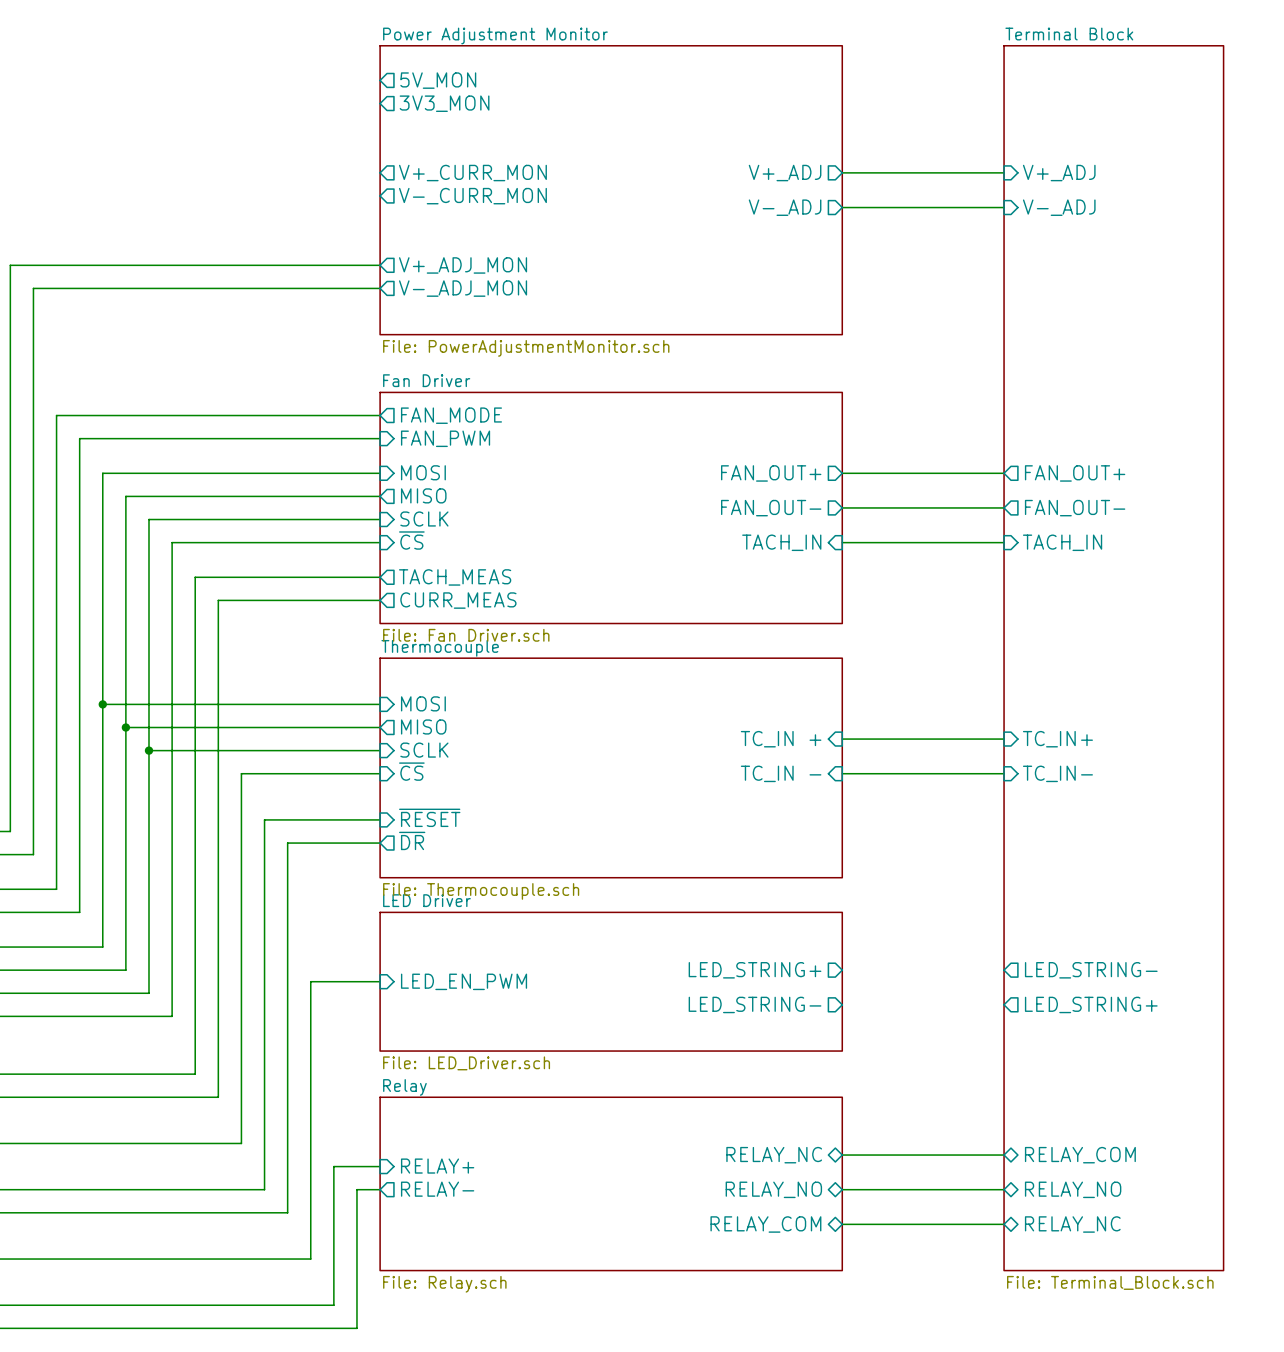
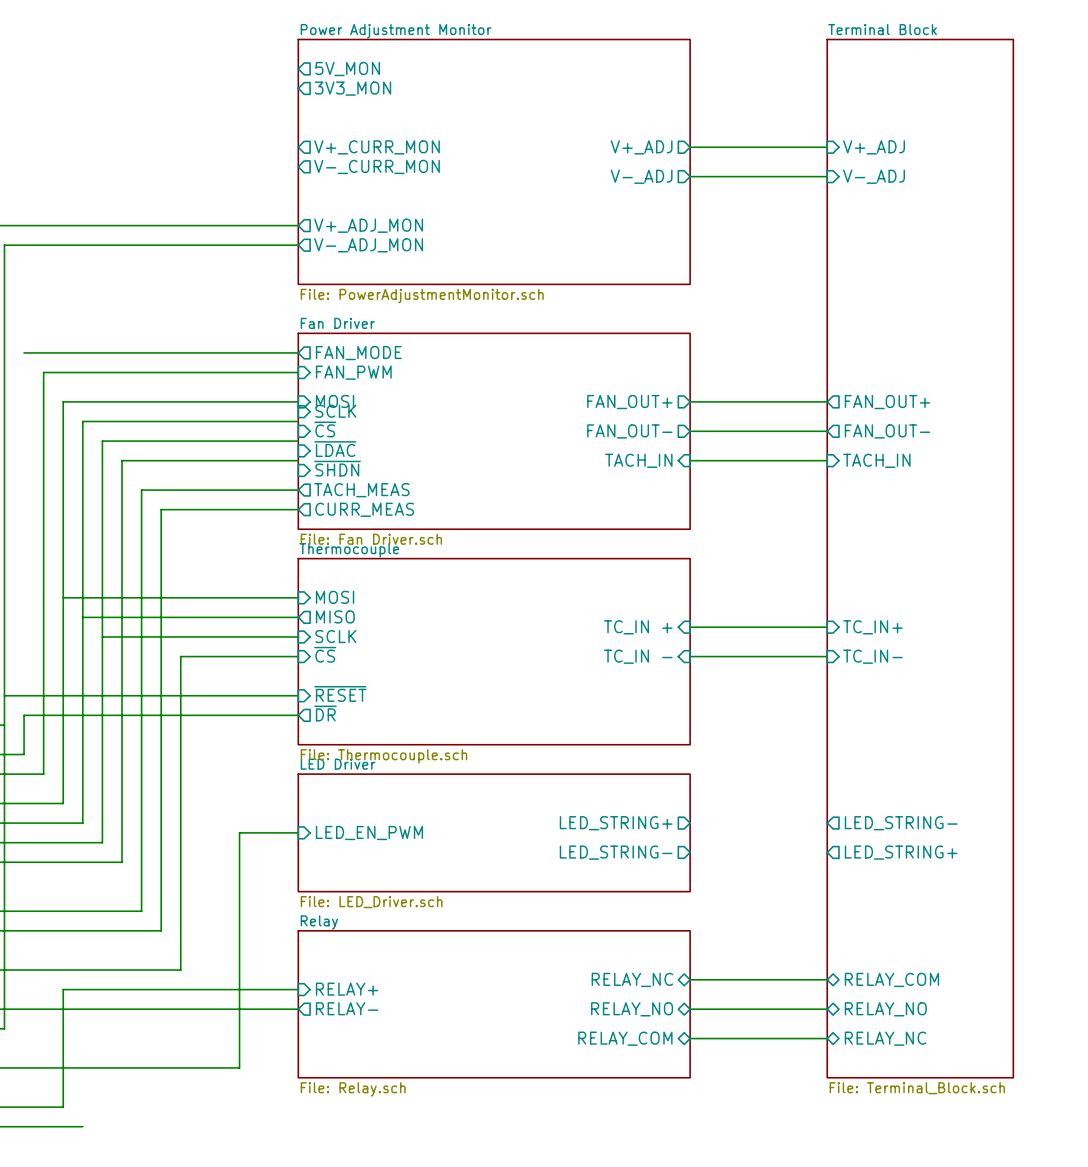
wire: (56, 415) (56, 843) -> (219, 715) (24, 715)
sheet pin: MISO (423, 495) -> none
sheet pin position: SCLK (424, 519) -> SCLK (335, 411)
sheet pin: none -> ~{LDAC} (335, 449)
sheet pin position: ~{CS} (411, 540) -> ~{CS} (325, 429)
sheet pin: none -> ~{SHDN} (337, 468)
junction: (102, 704) -> none
junction: (125, 727) -> none
junction: (148, 750) -> none
wire: (264, 819) (264, 1189) -> (200, 695) (4, 695)
wire: (287, 843) (287, 1212) (33, 1212) -> (4, 725) (4, 1028)
wire: (333, 1166) (333, 1305) (102, 1305) -> (259, 989) (63, 989) (63, 1107)
wire: (356, 1189) (356, 1328) (125, 1328) -> (278, 1009) (200, 1009)

